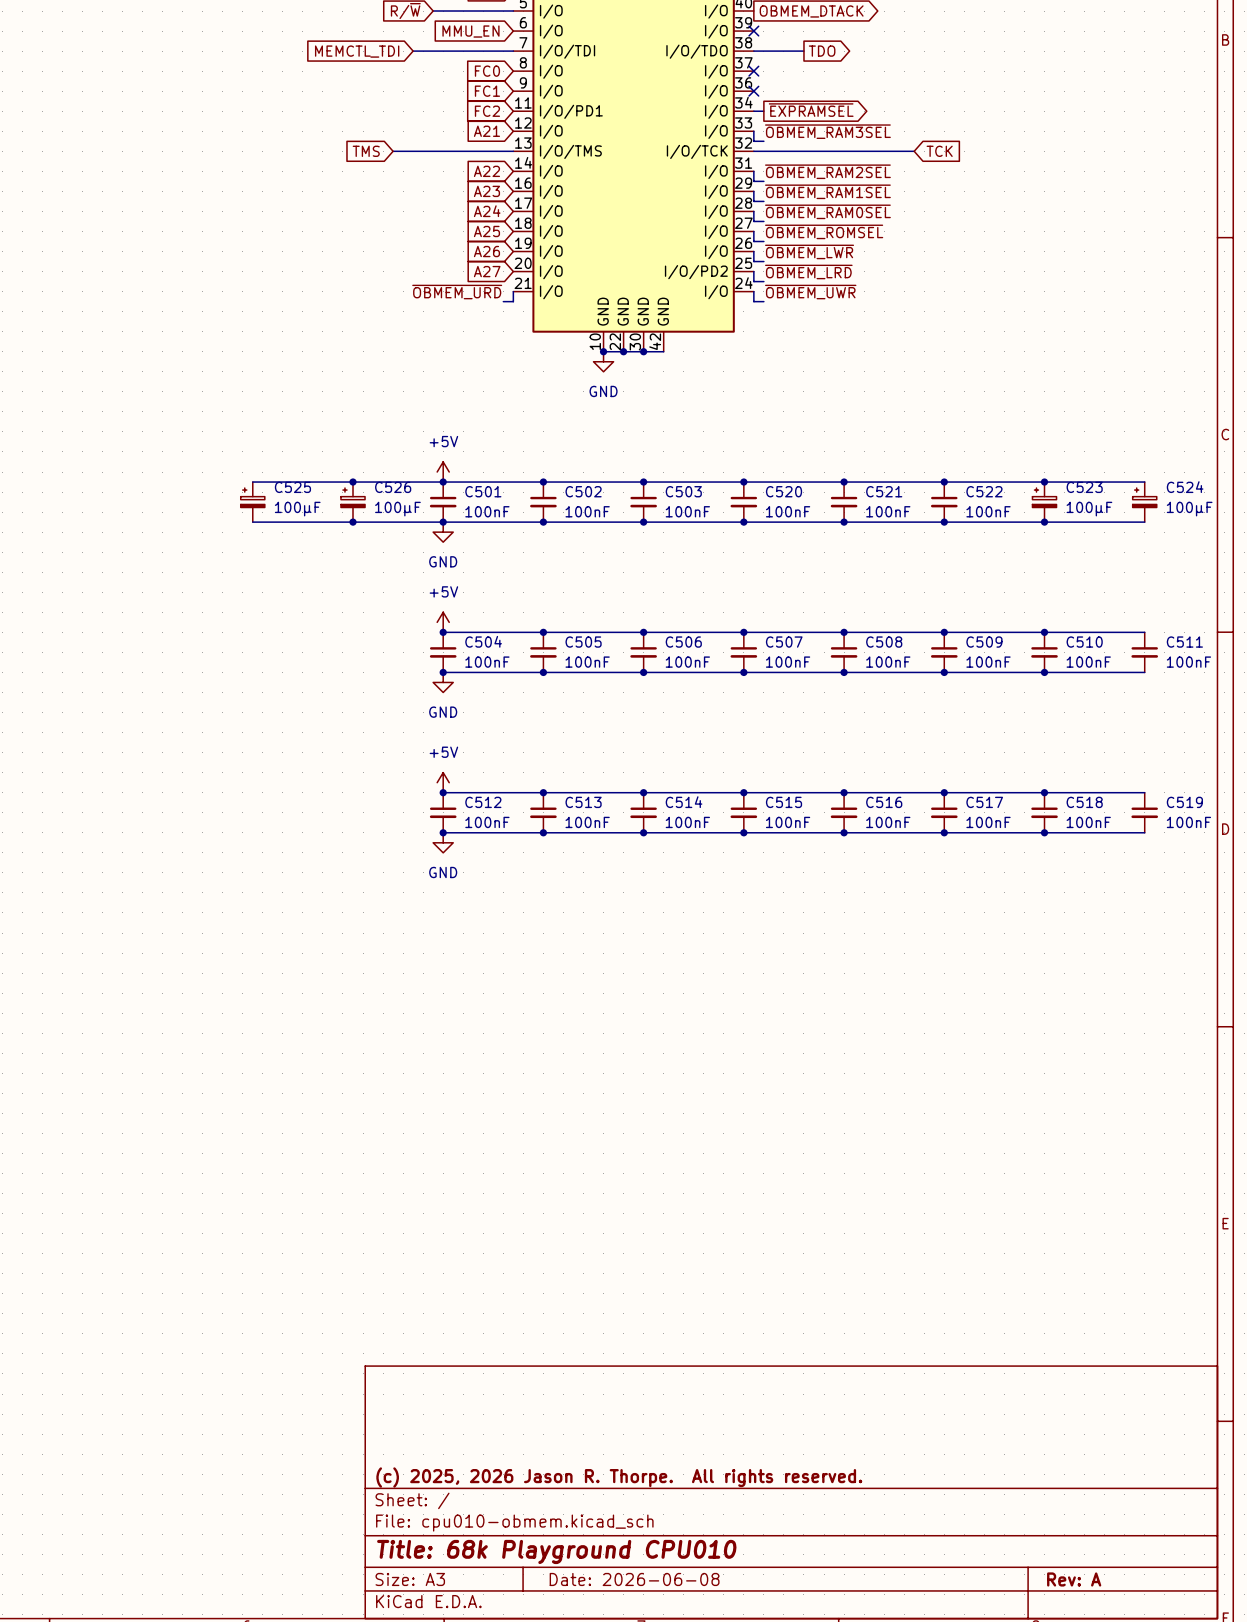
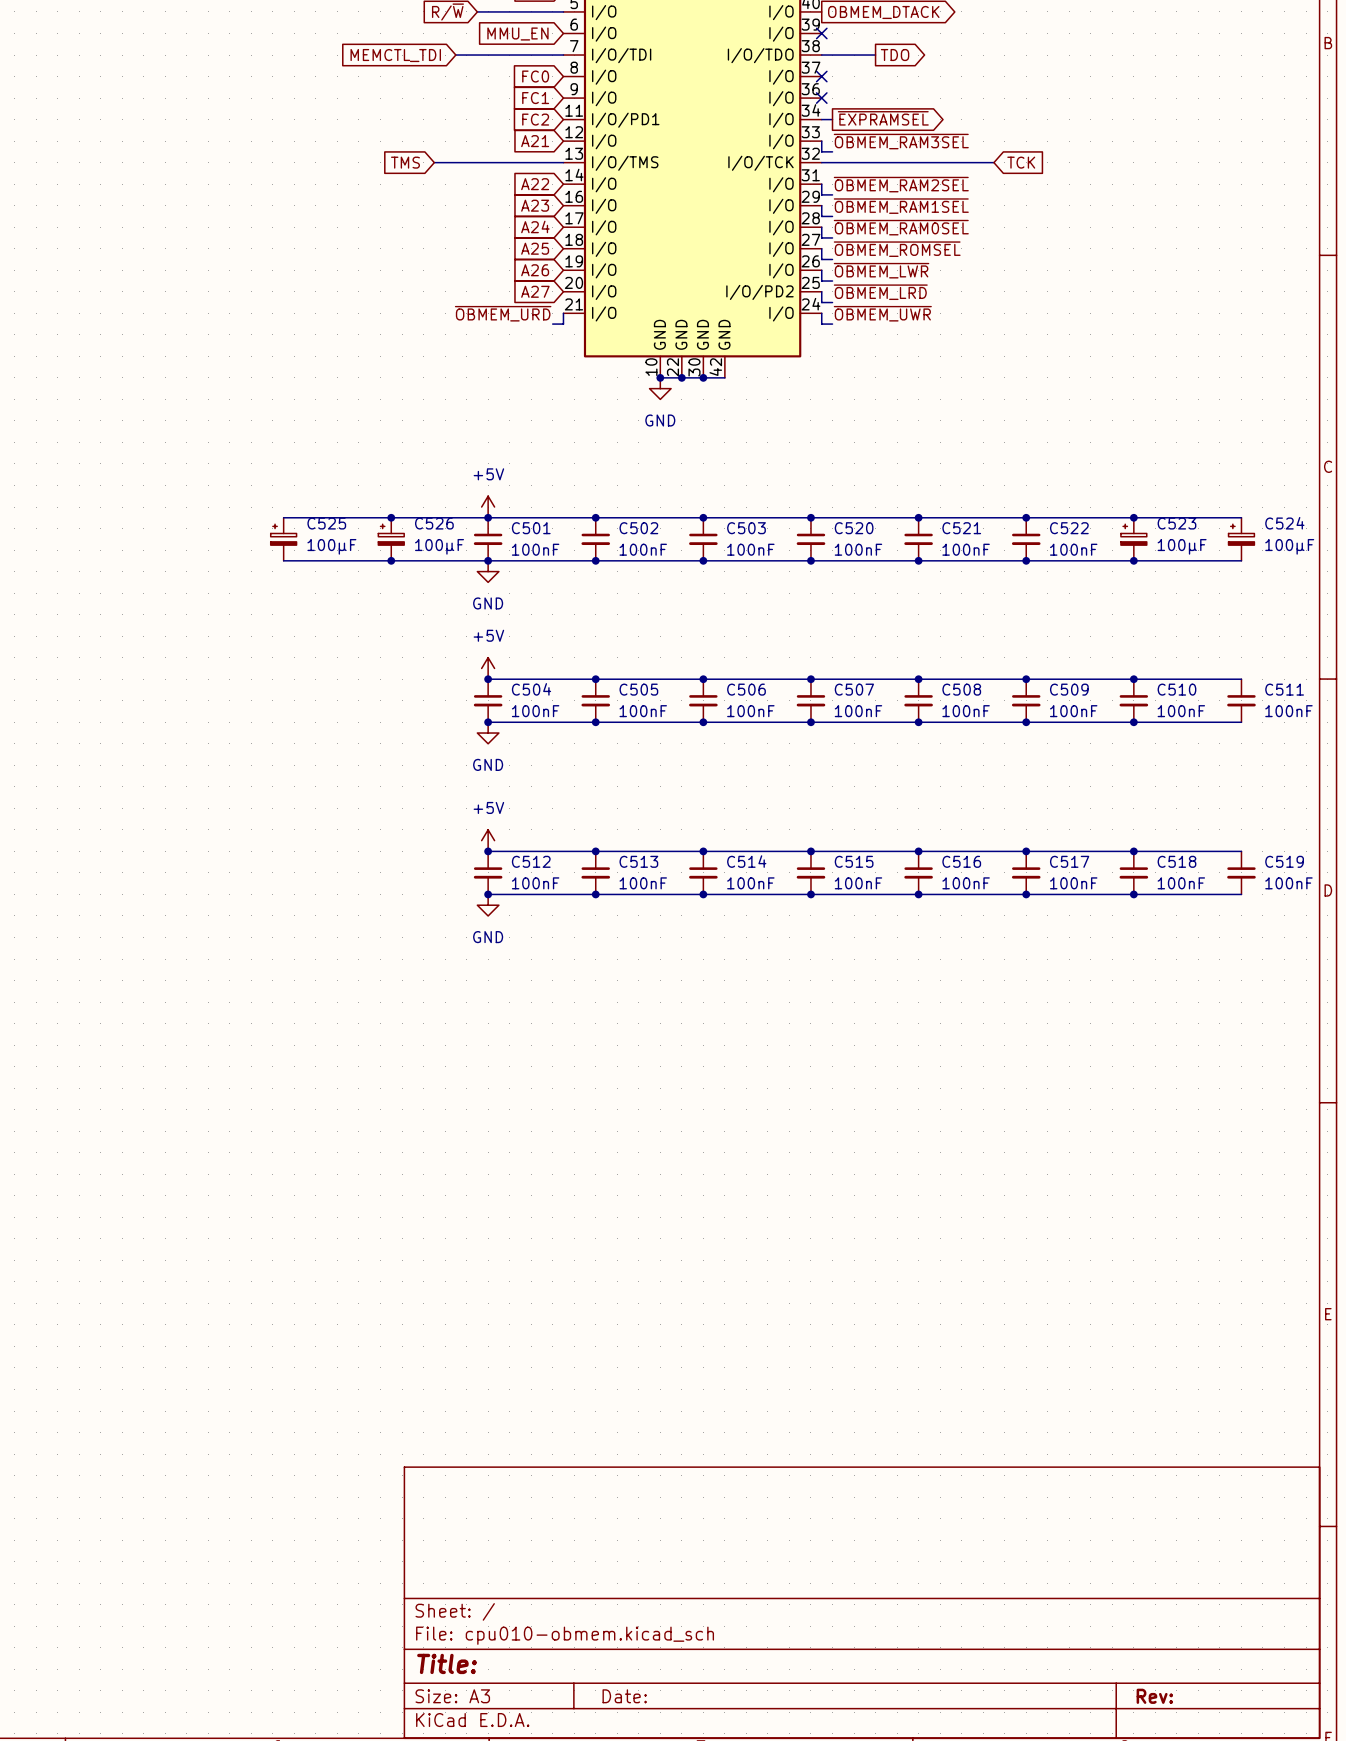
title block: (c) 2025, 2026 Jason R. Thorpe. All rights reserved. (619, 1477) -> none
title block: Title: 68k Playground CPU010 (556, 1551) -> Title: (447, 1663)
title block: Date: 2026-06-08 (634, 1579) -> Date: (624, 1696)
title block: Rev: A (1074, 1579) -> Rev: (1154, 1696)

